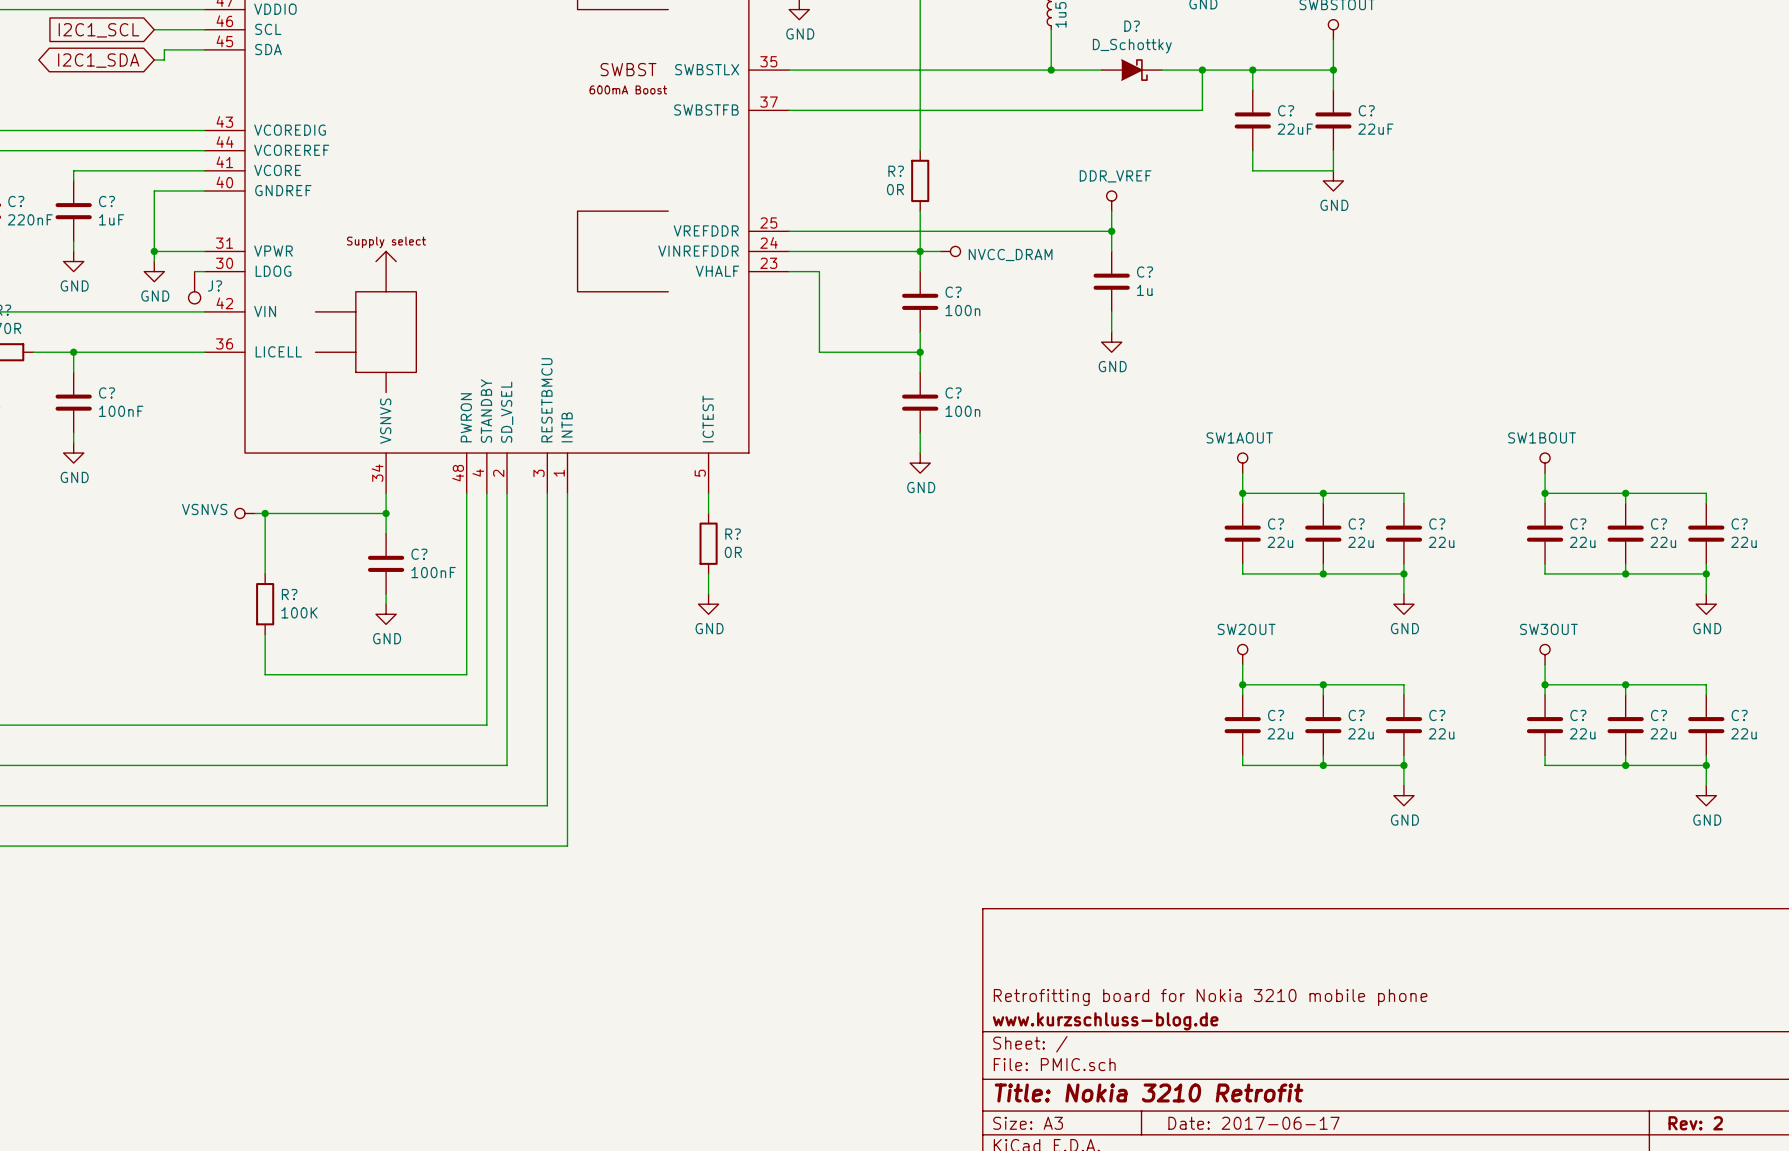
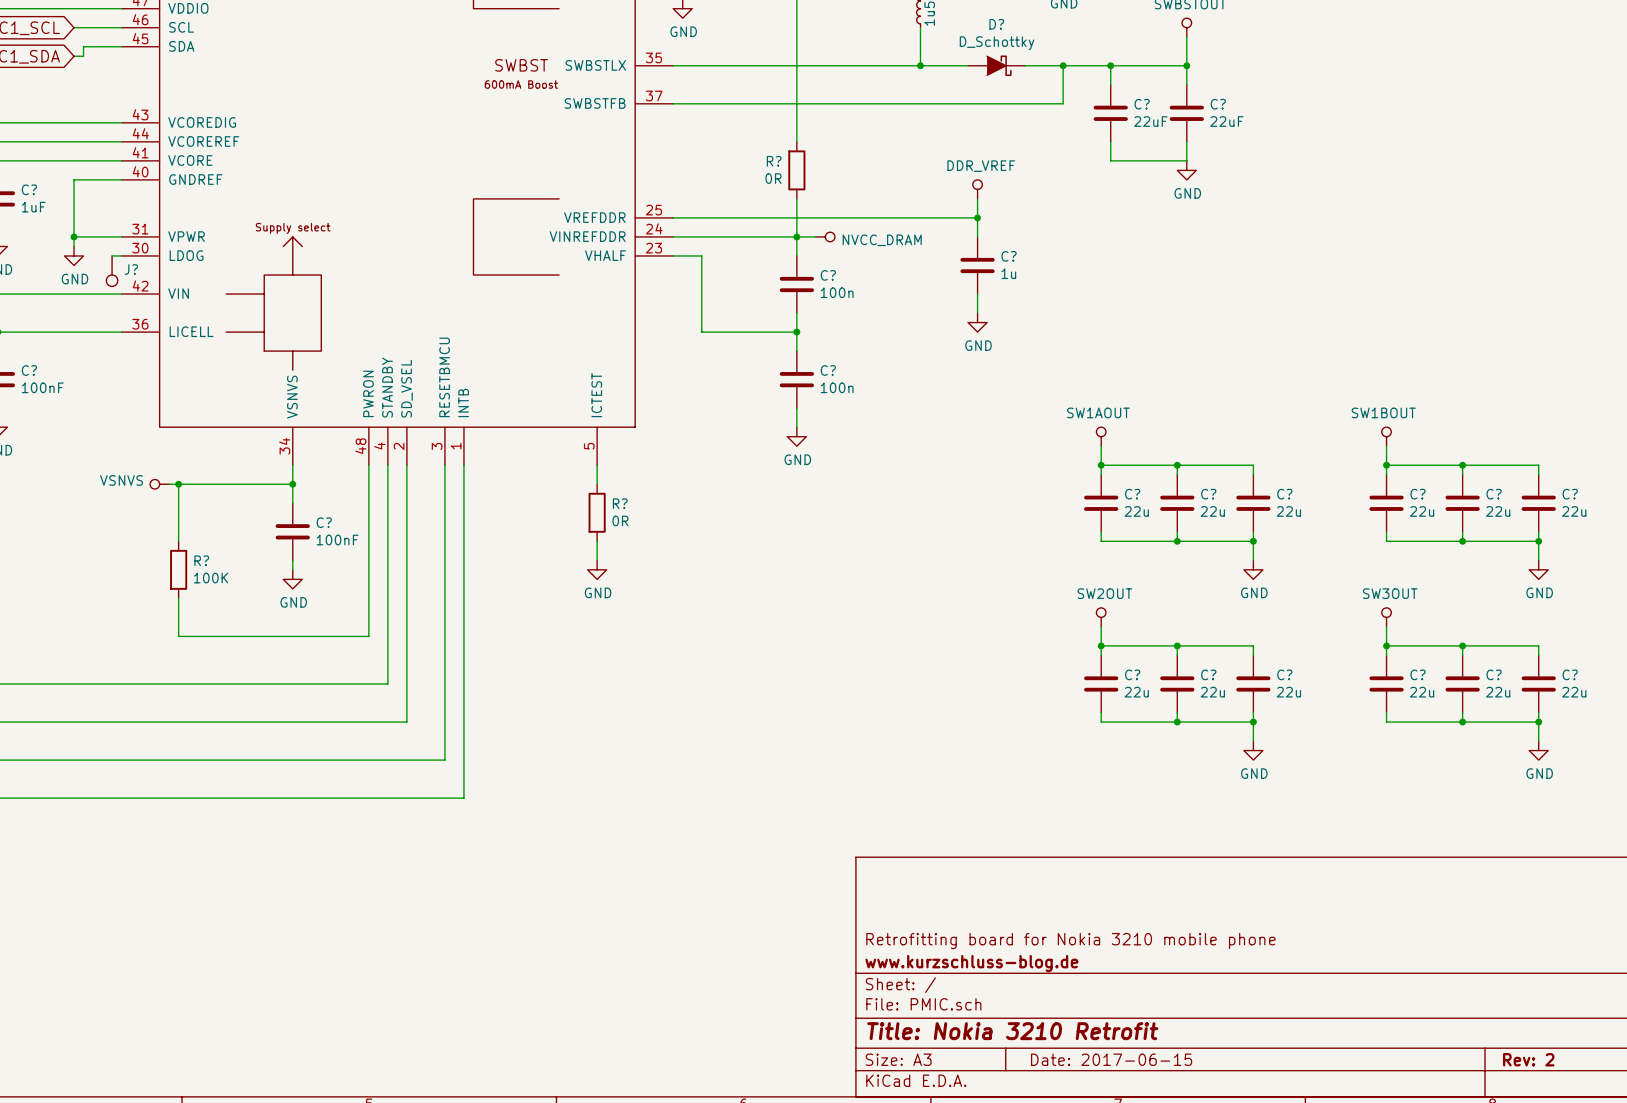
title block: Date: 2017-06-17 (1253, 1123) -> Date: 2017-06-15 (1111, 1059)

